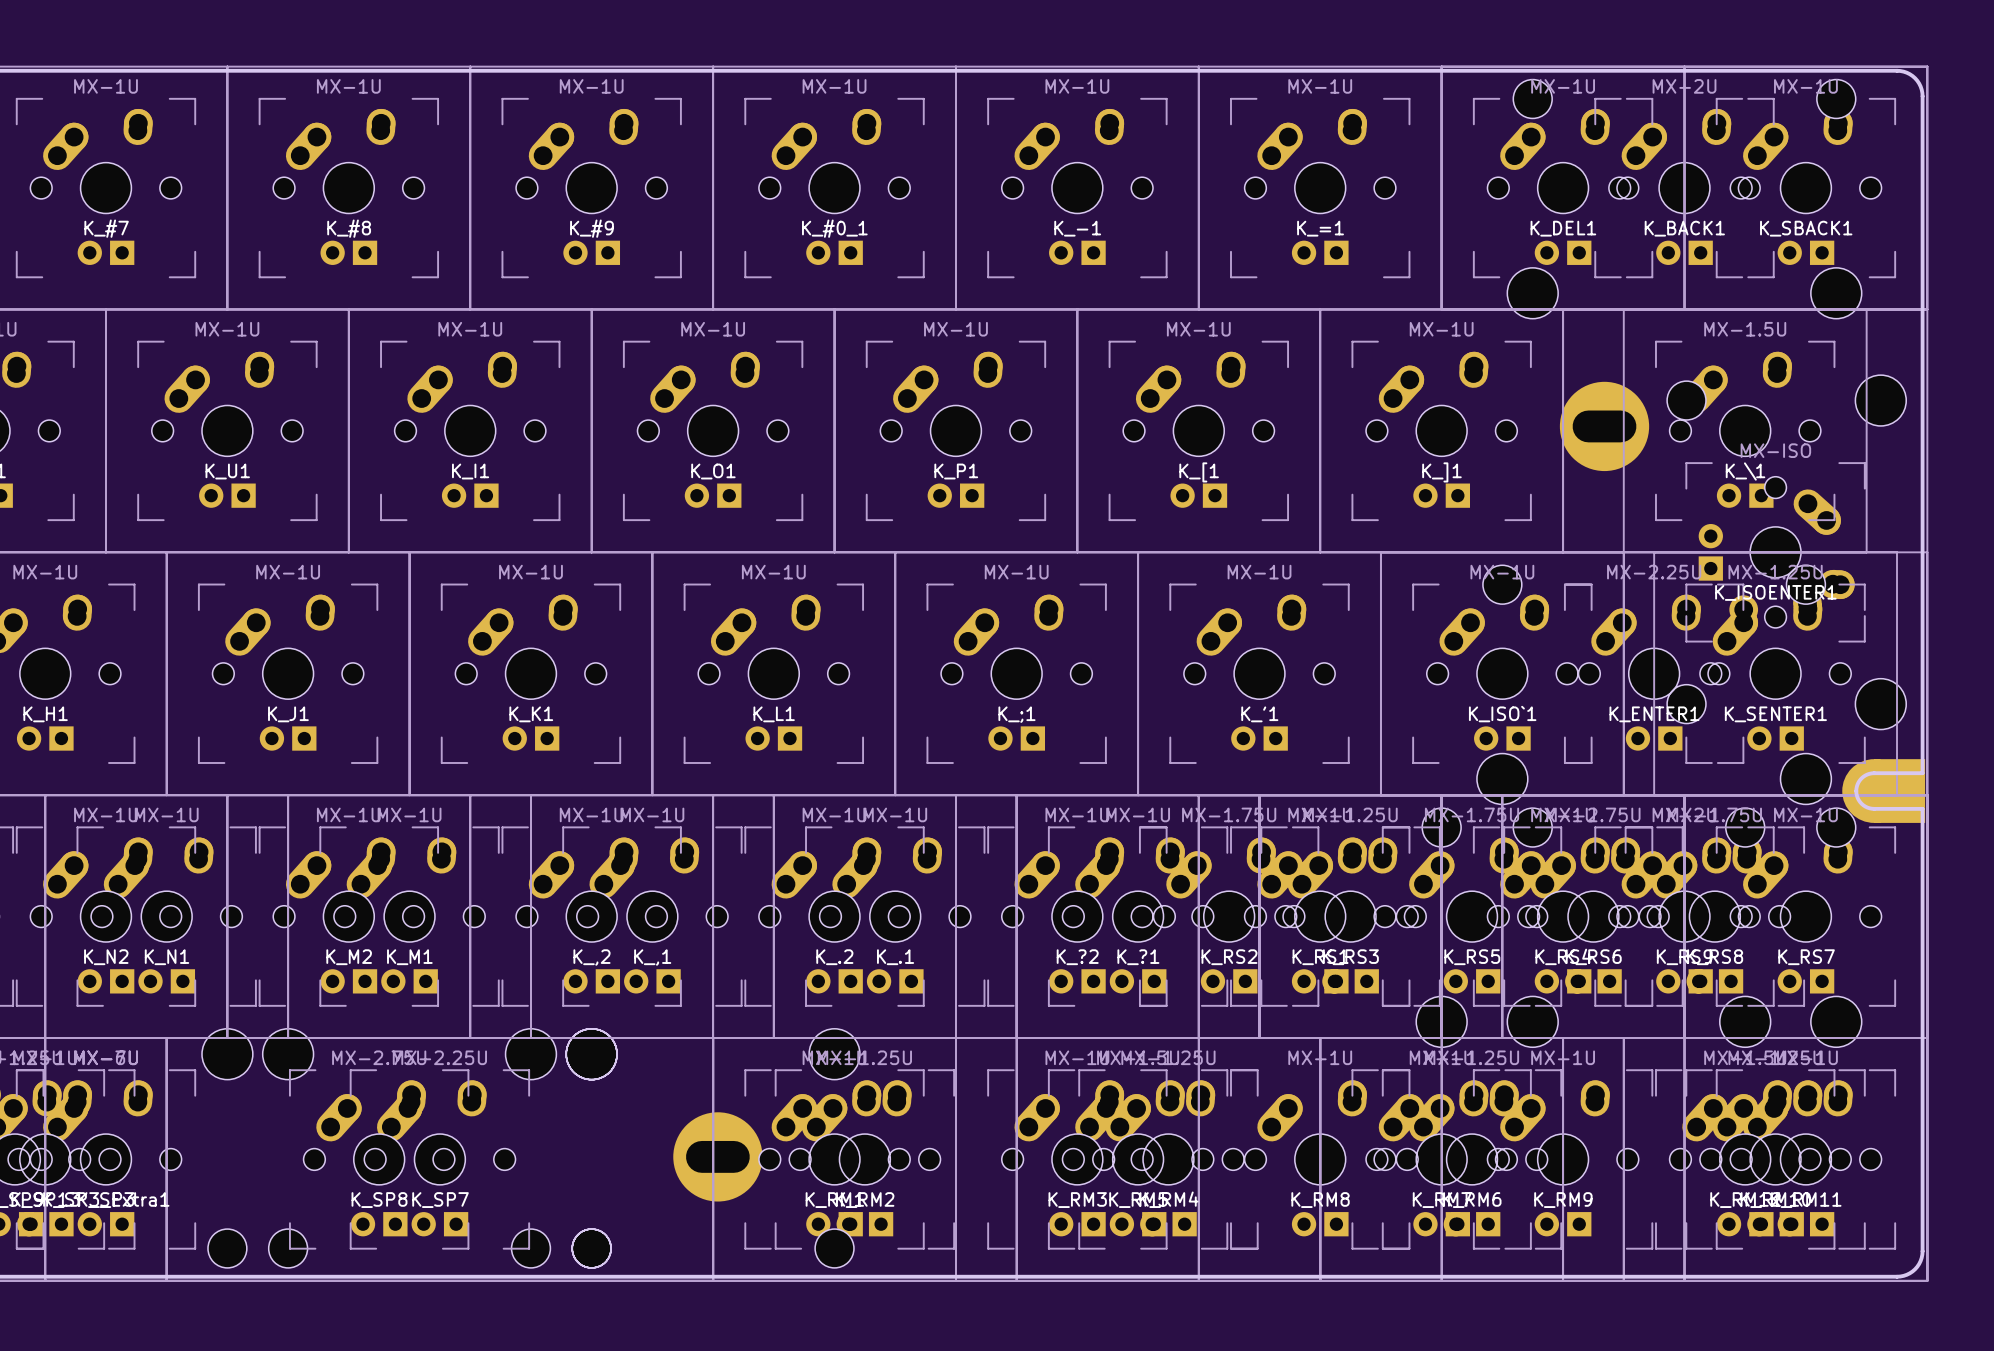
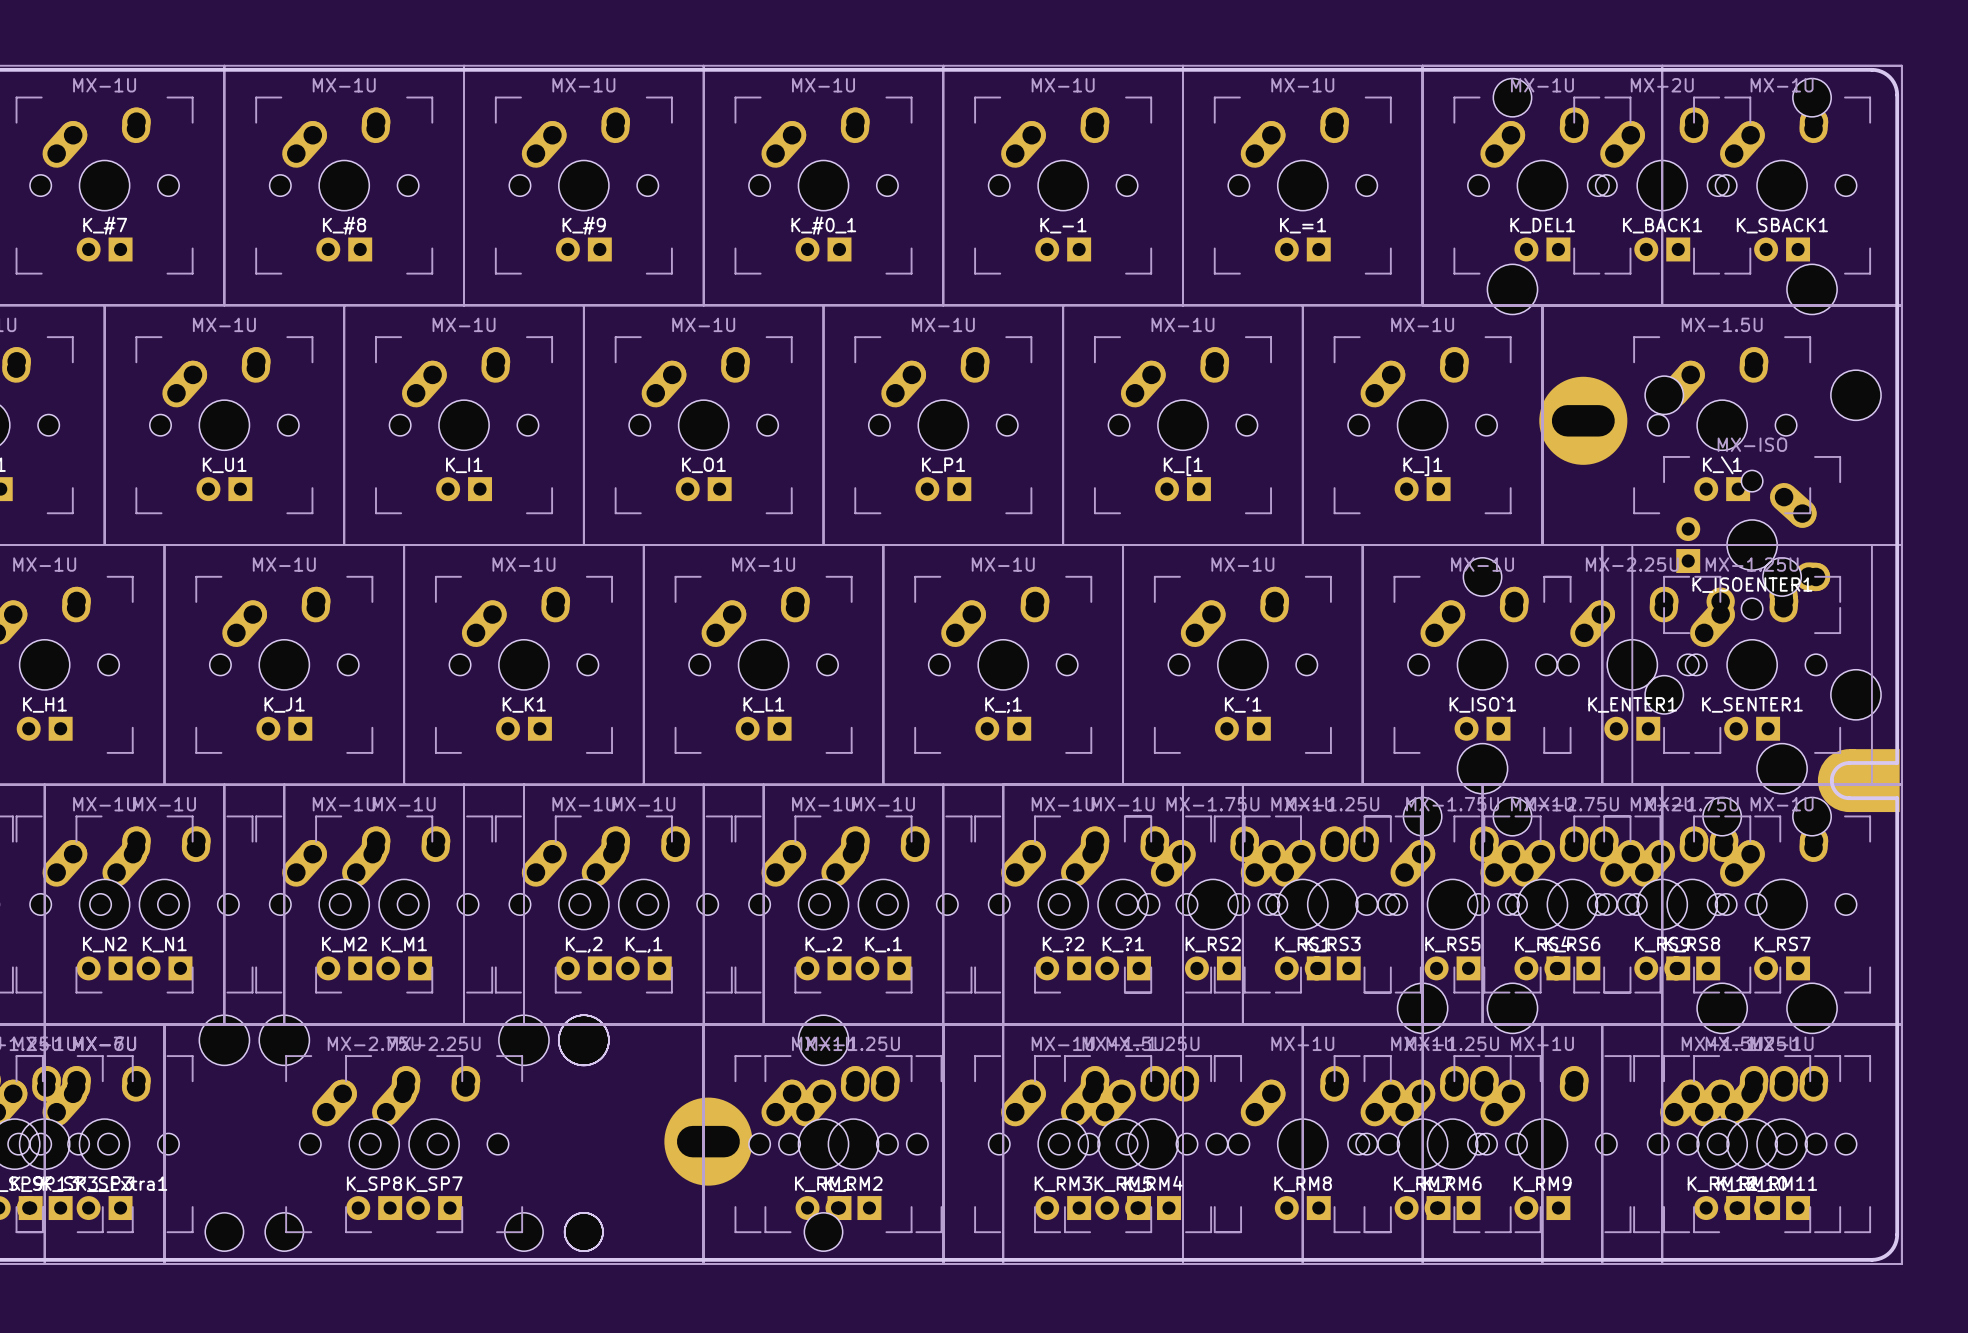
K_\1 footprint: [1622, 308, 1868, 554] -> [1541, 304, 1903, 546]

